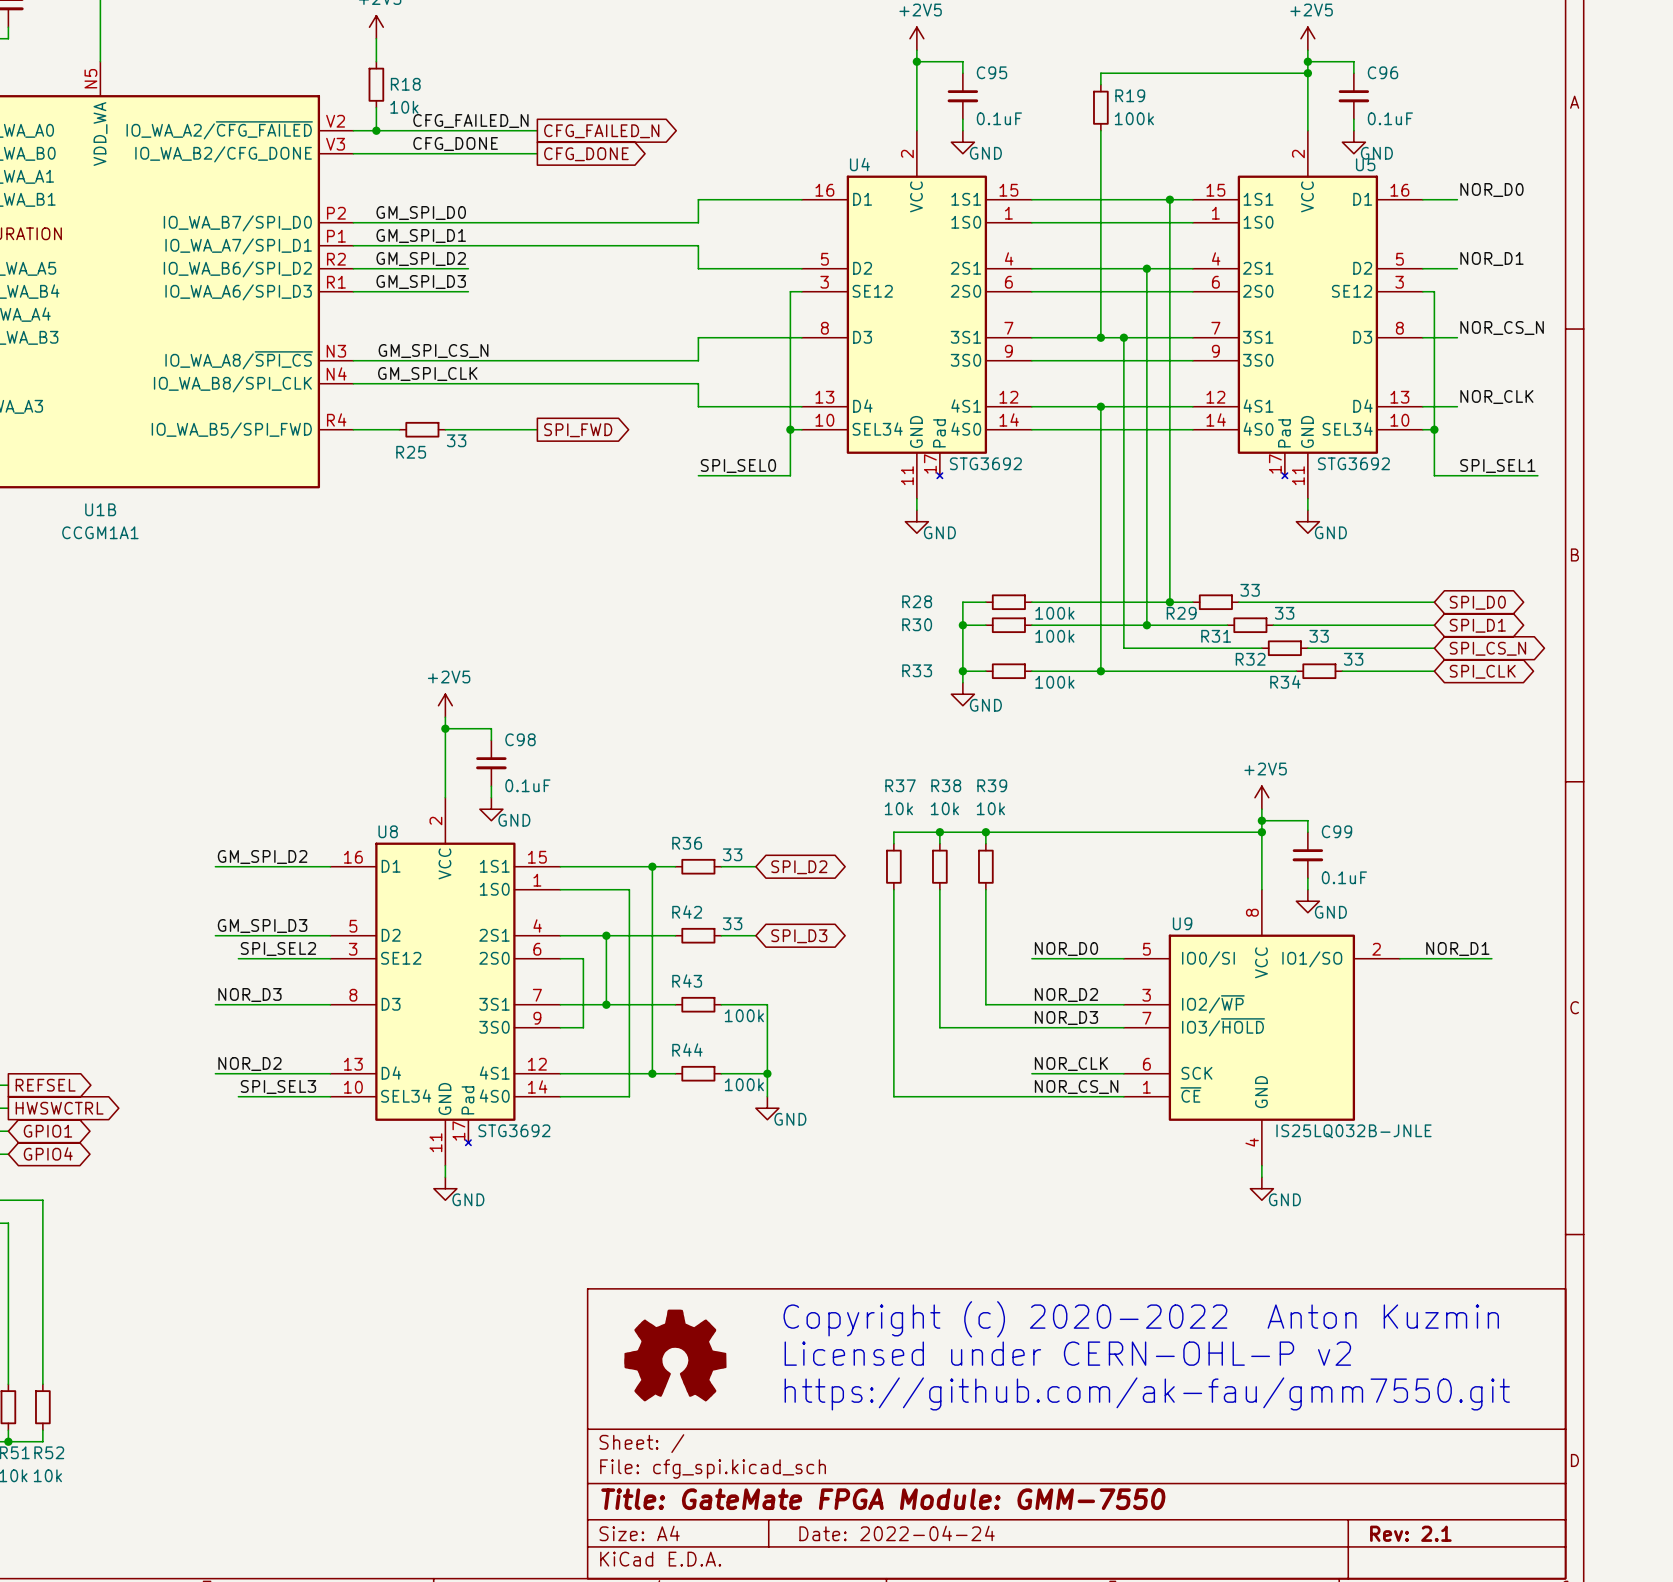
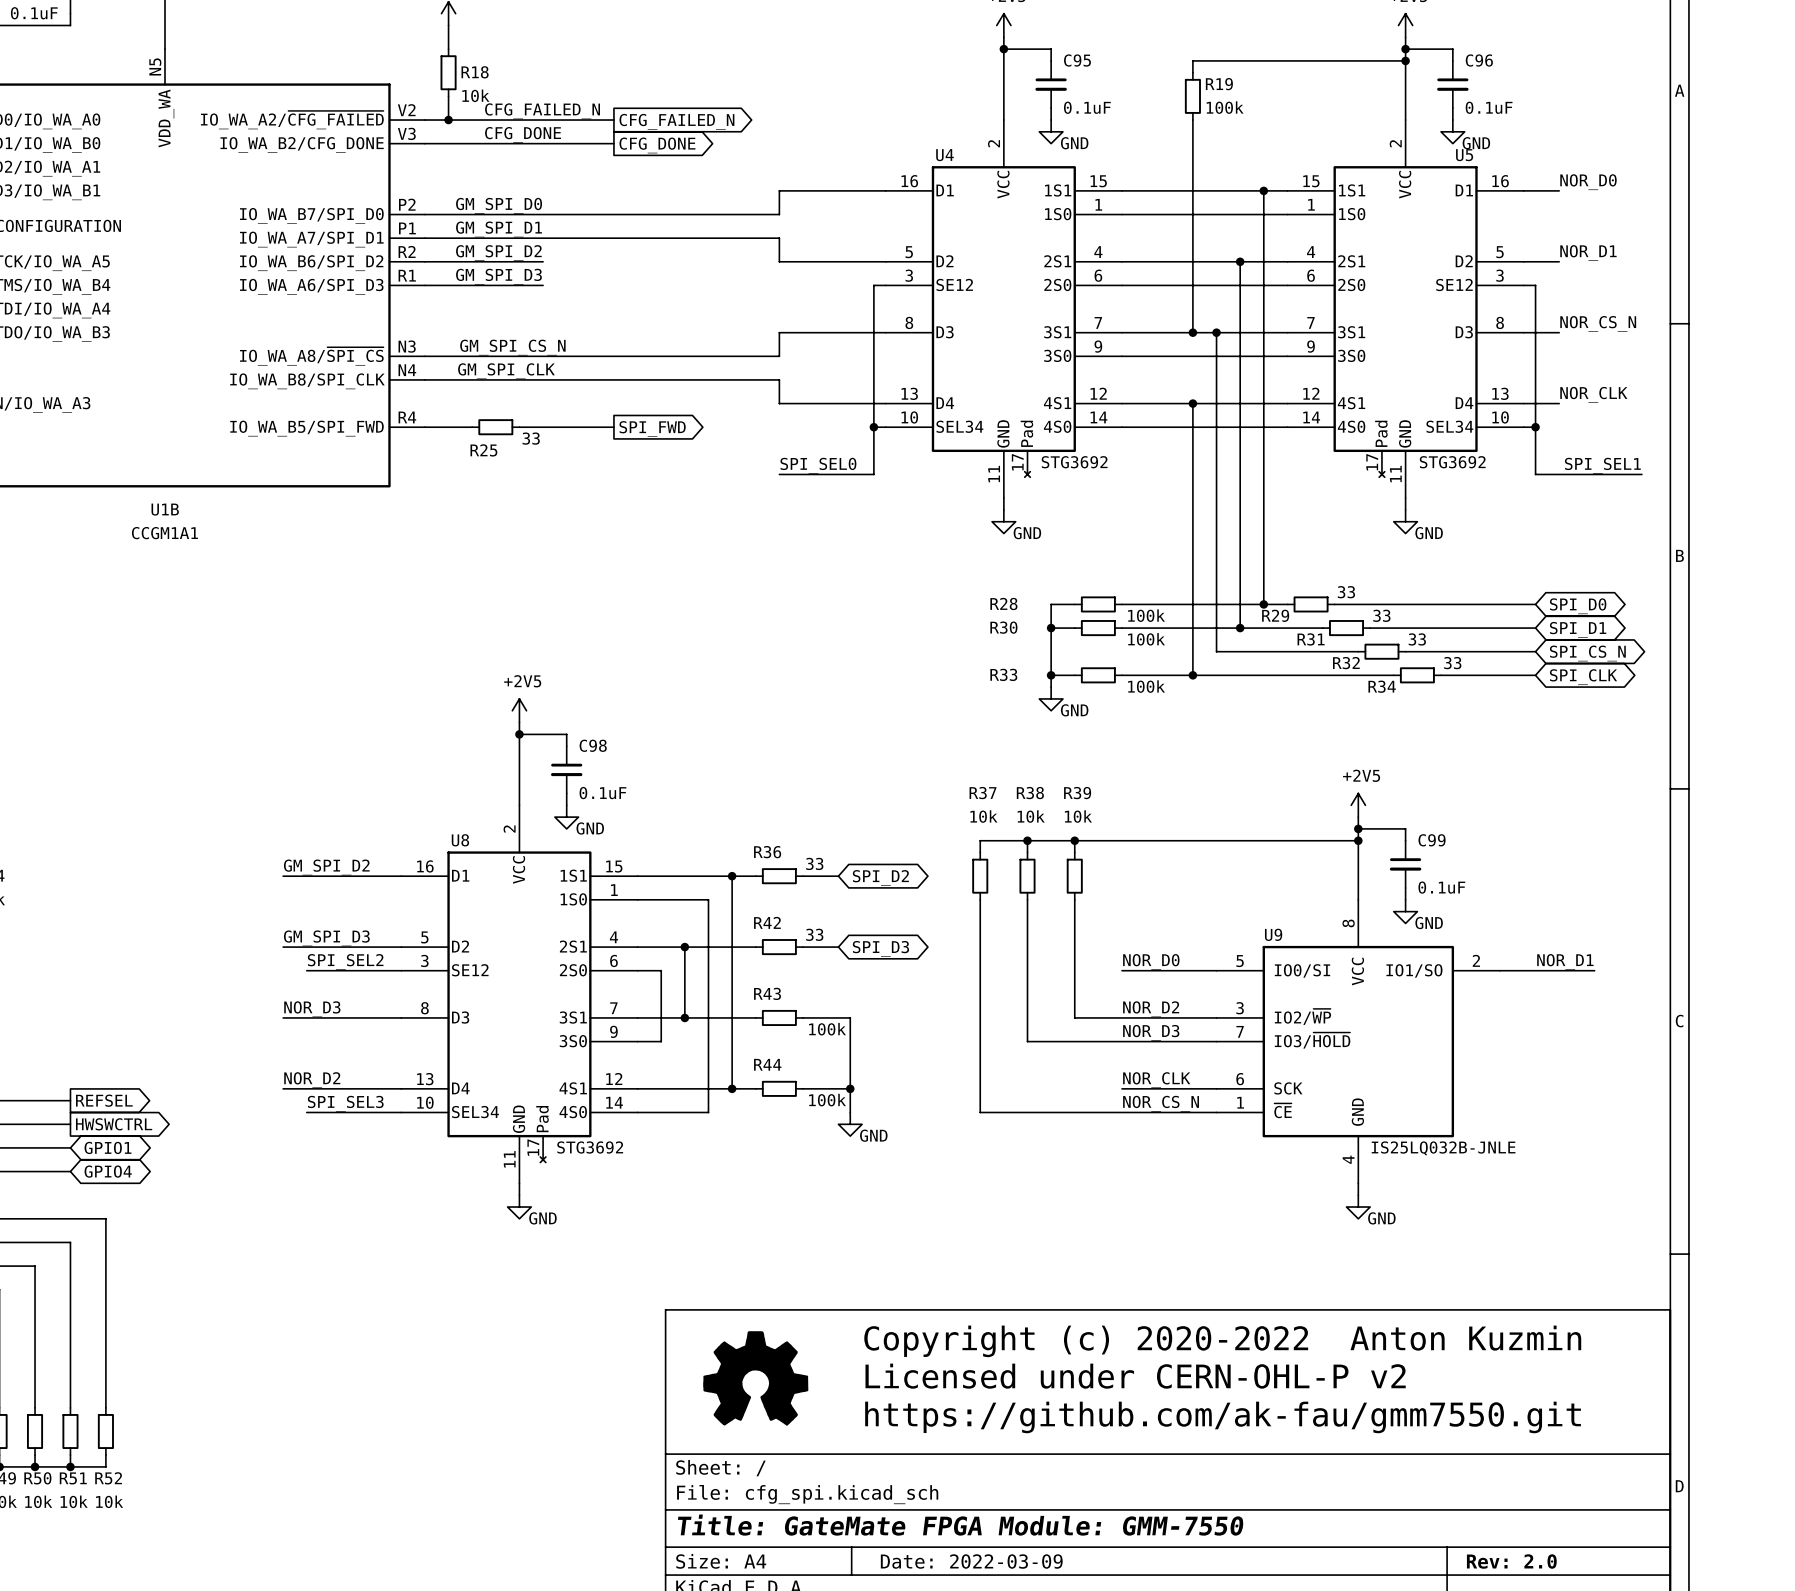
title block: Date: 2022-04-24 (897, 1533) -> Date: 2022-03-09 (971, 1561)
title block: Rev: 2.1 (1410, 1533) -> Rev: 2.0 (1511, 1561)

